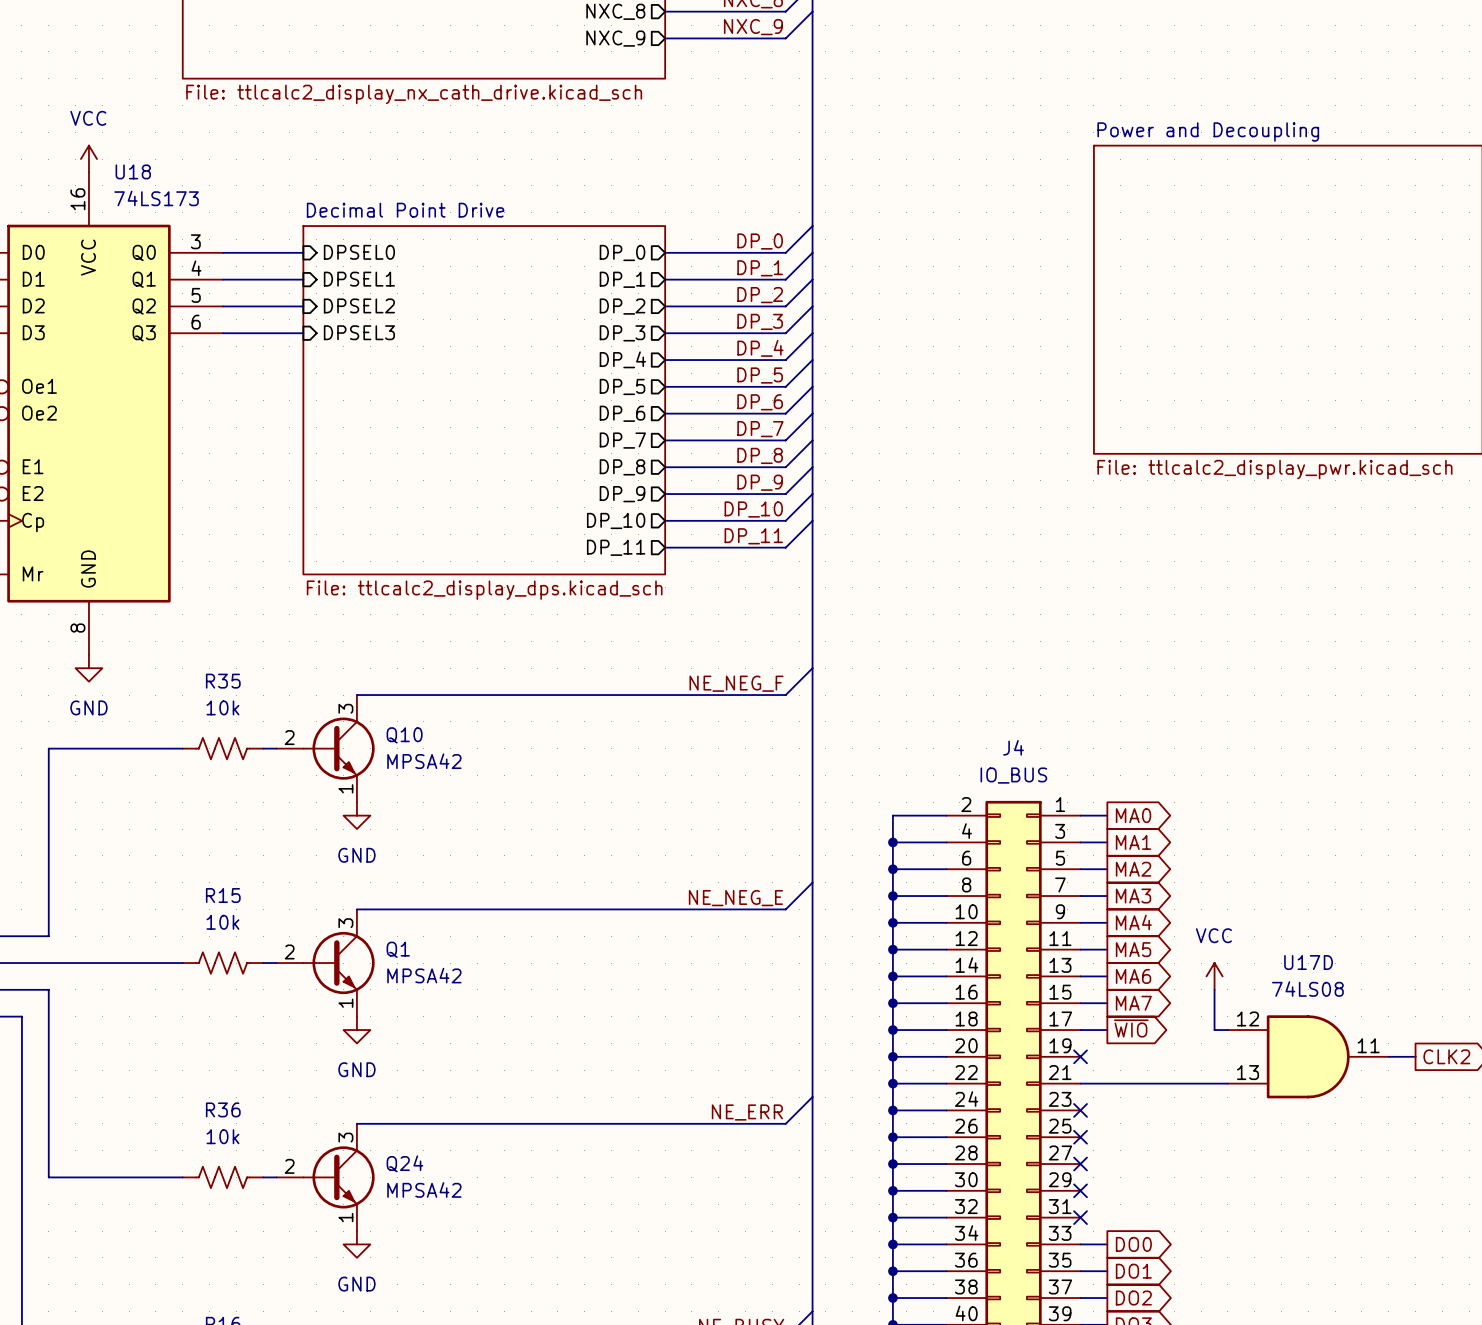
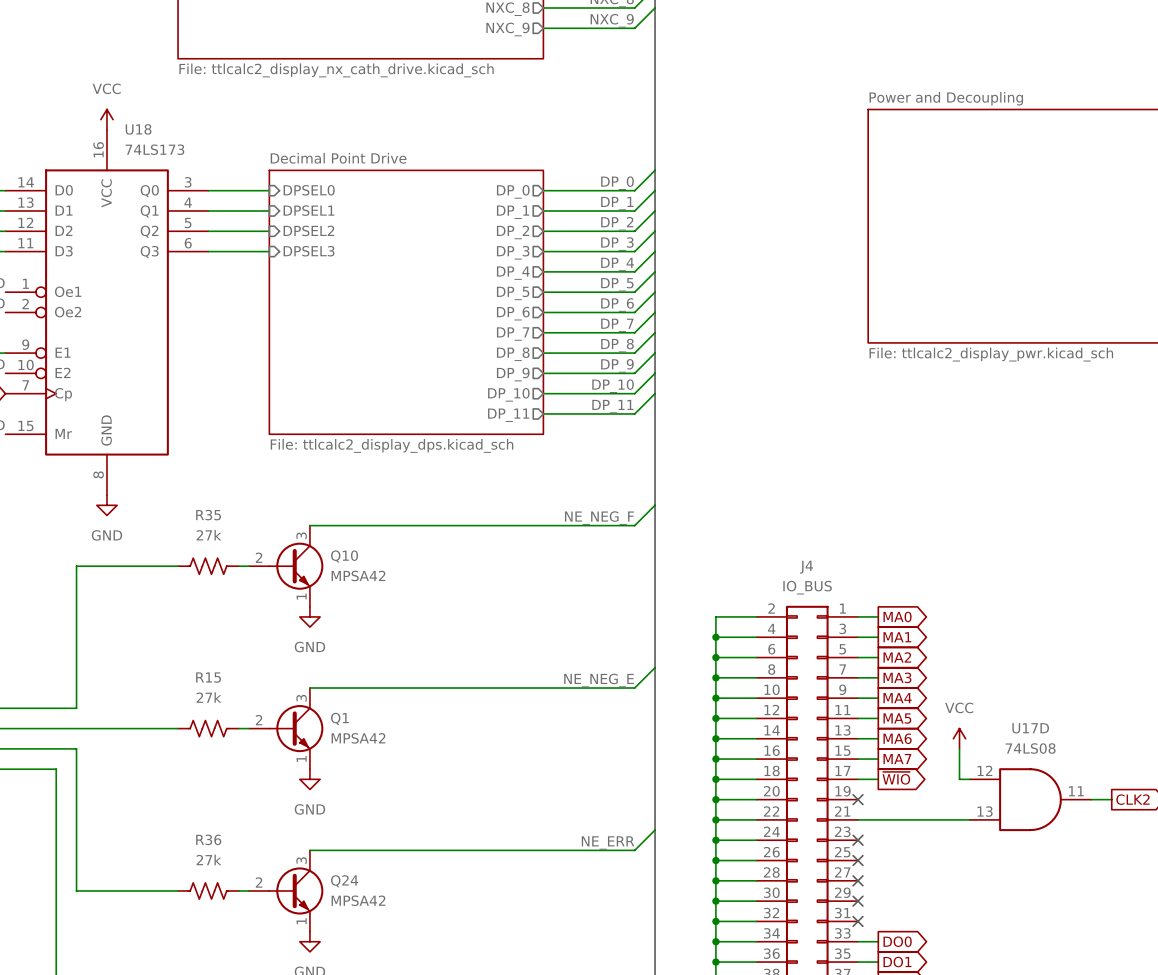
R35 value: 10k (222, 707) -> 27k (208, 535)
R15 value: 10k (222, 922) -> 27k (208, 697)
R36 value: 10k (222, 1136) -> 27k (208, 859)

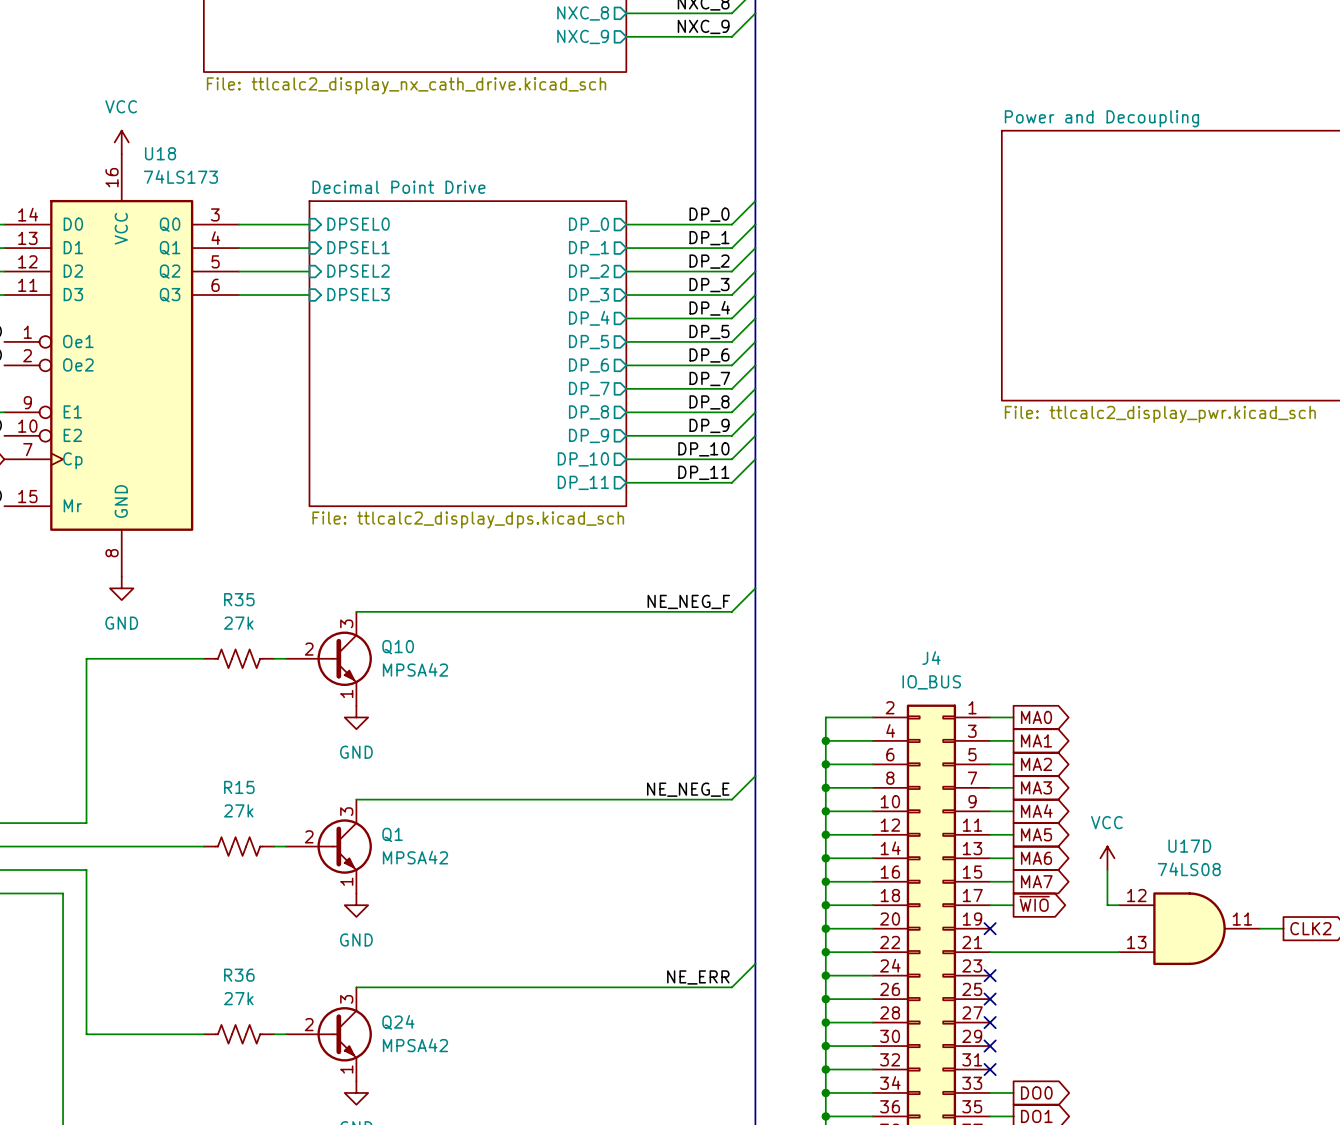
Q10 symbol: [249, 525, 324, 607] -> [286, 611, 372, 706]
Q1 symbol: [249, 688, 324, 770] -> [286, 799, 372, 894]
Q24 symbol: [249, 850, 324, 932] -> [286, 987, 372, 1082]

